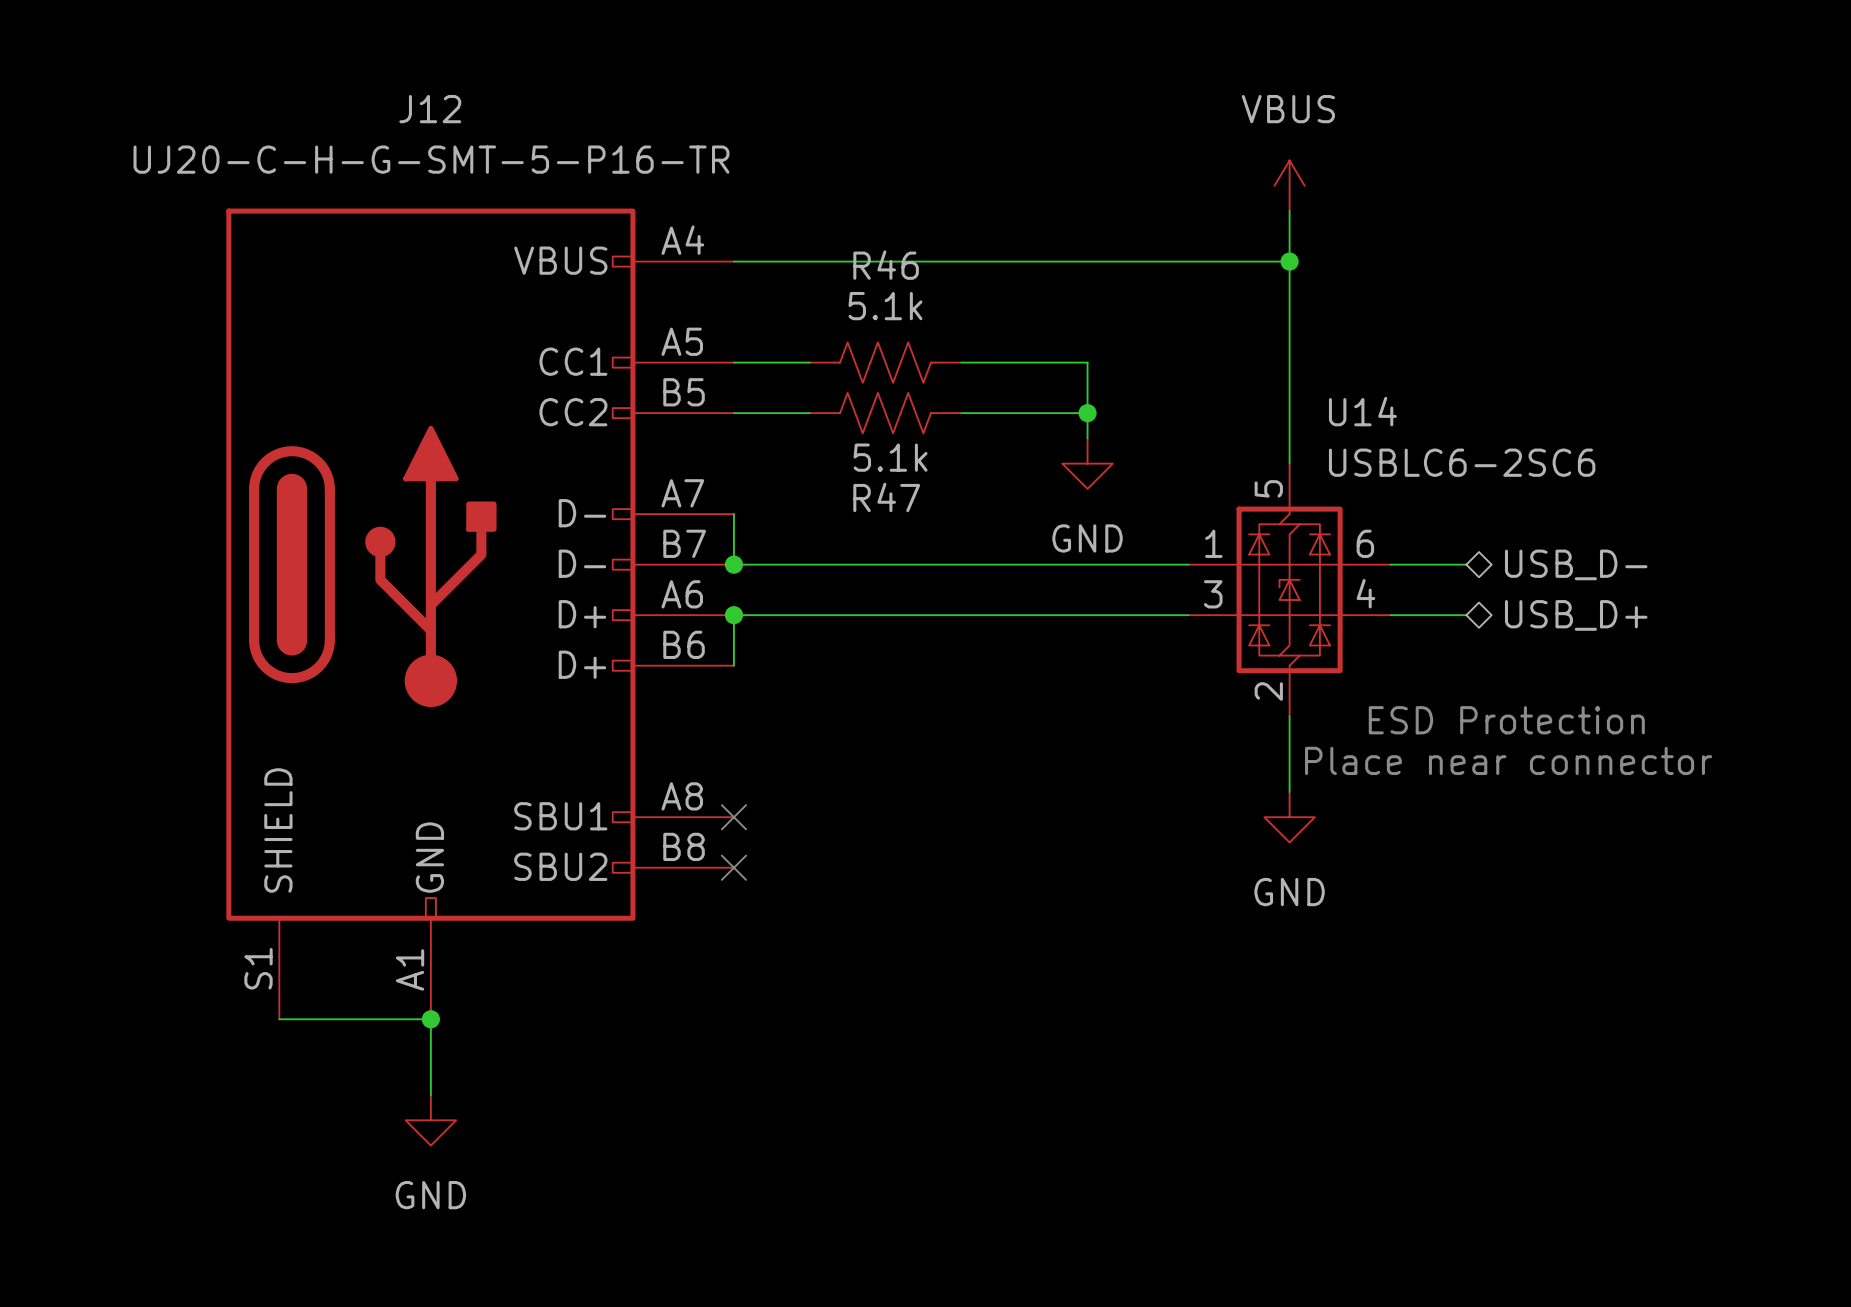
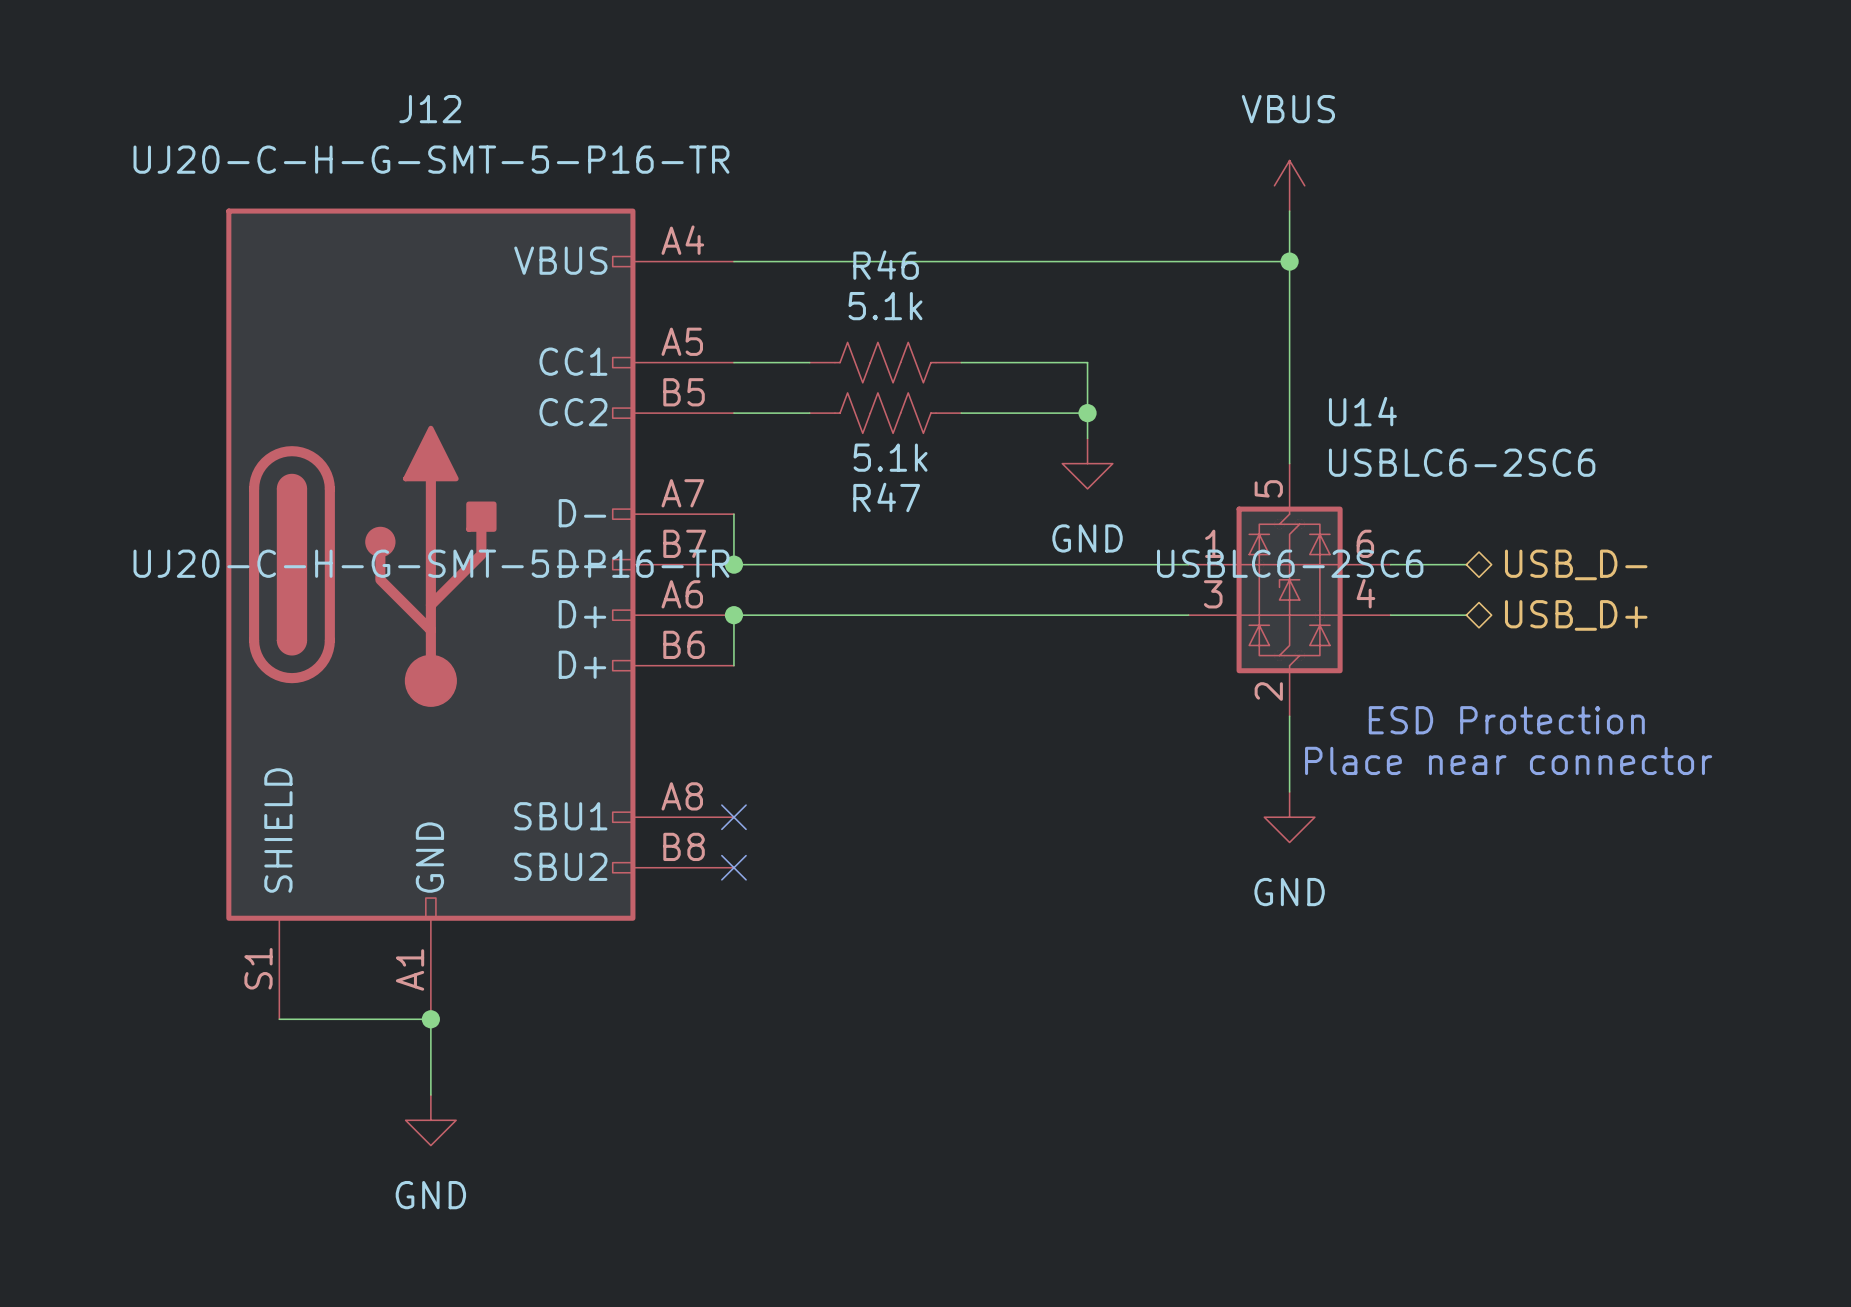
J12 text: none -> UJ20-C-H-G-SMT-5-P16-TR (431, 563)
U14 text: none -> USBLC6-2SC6 (1290, 563)

